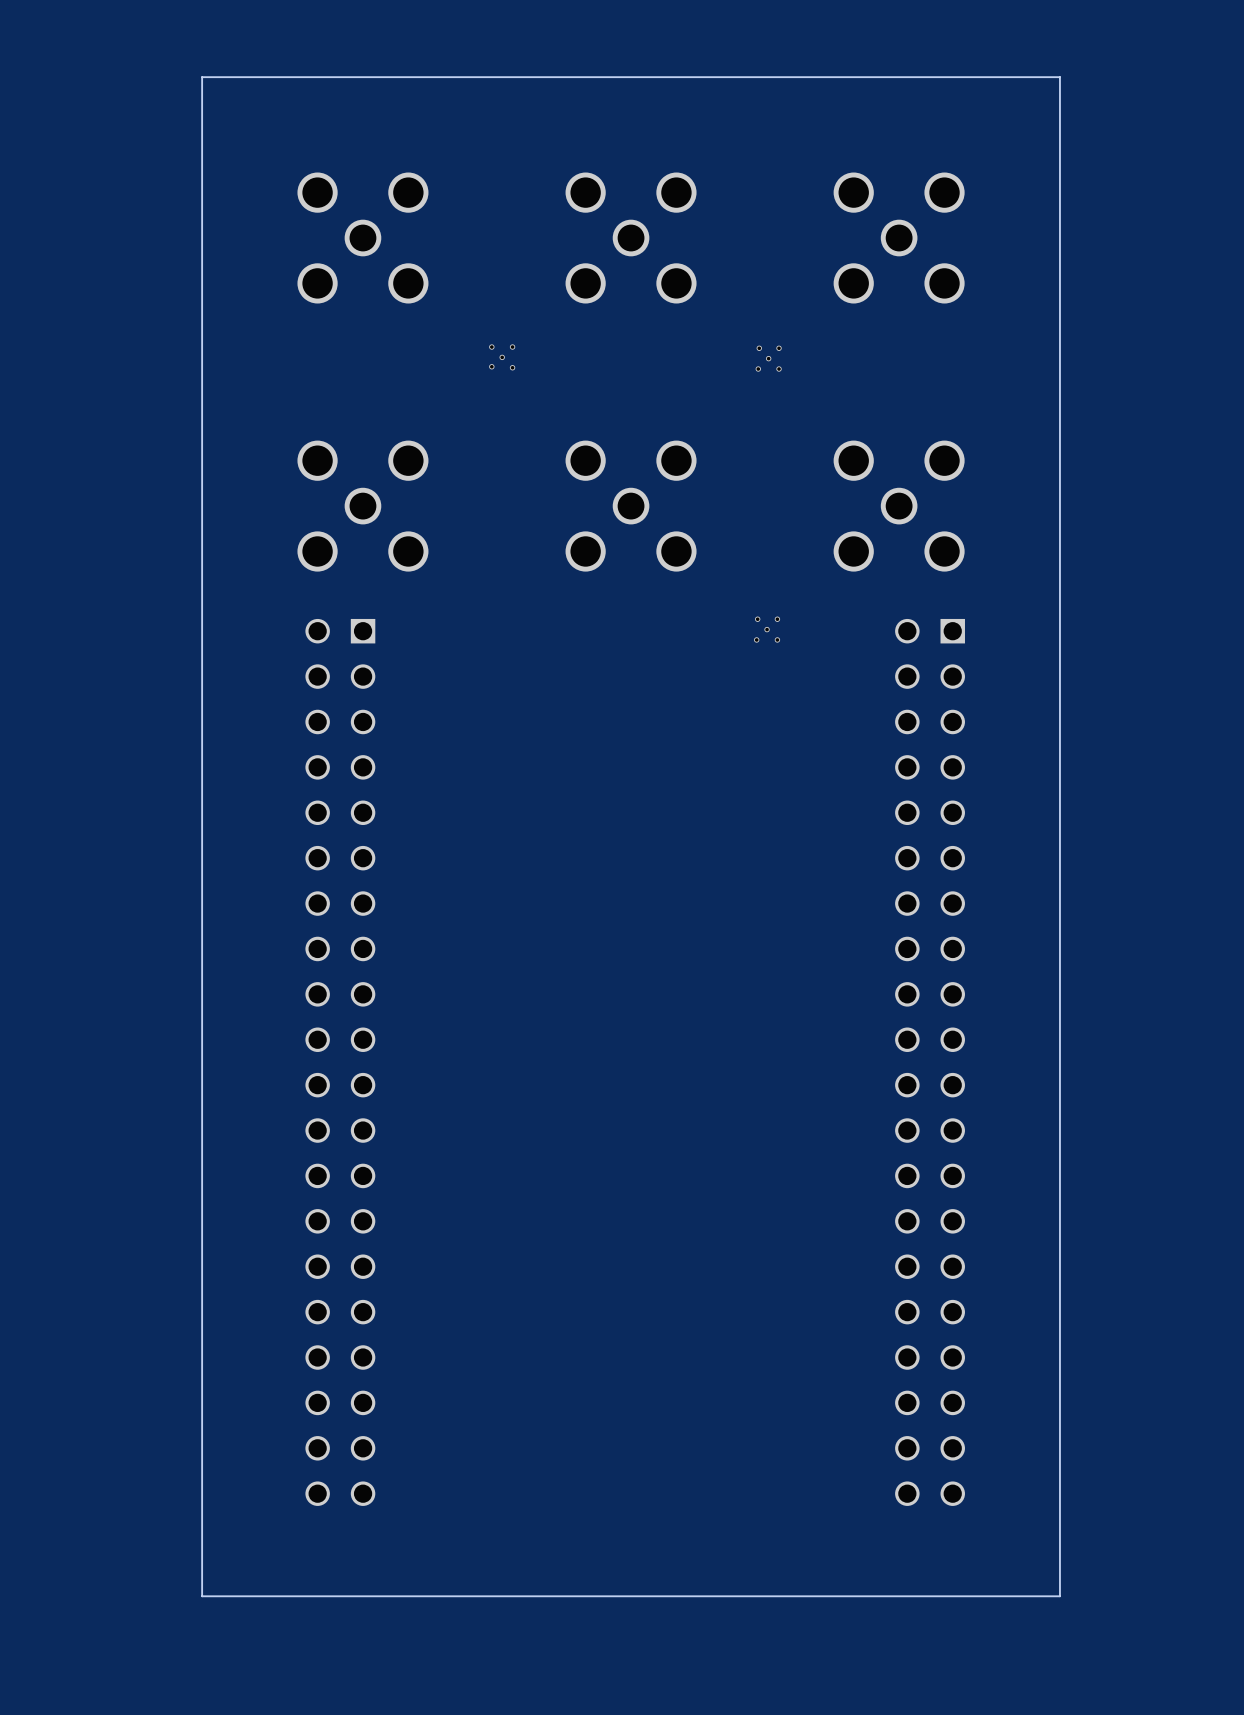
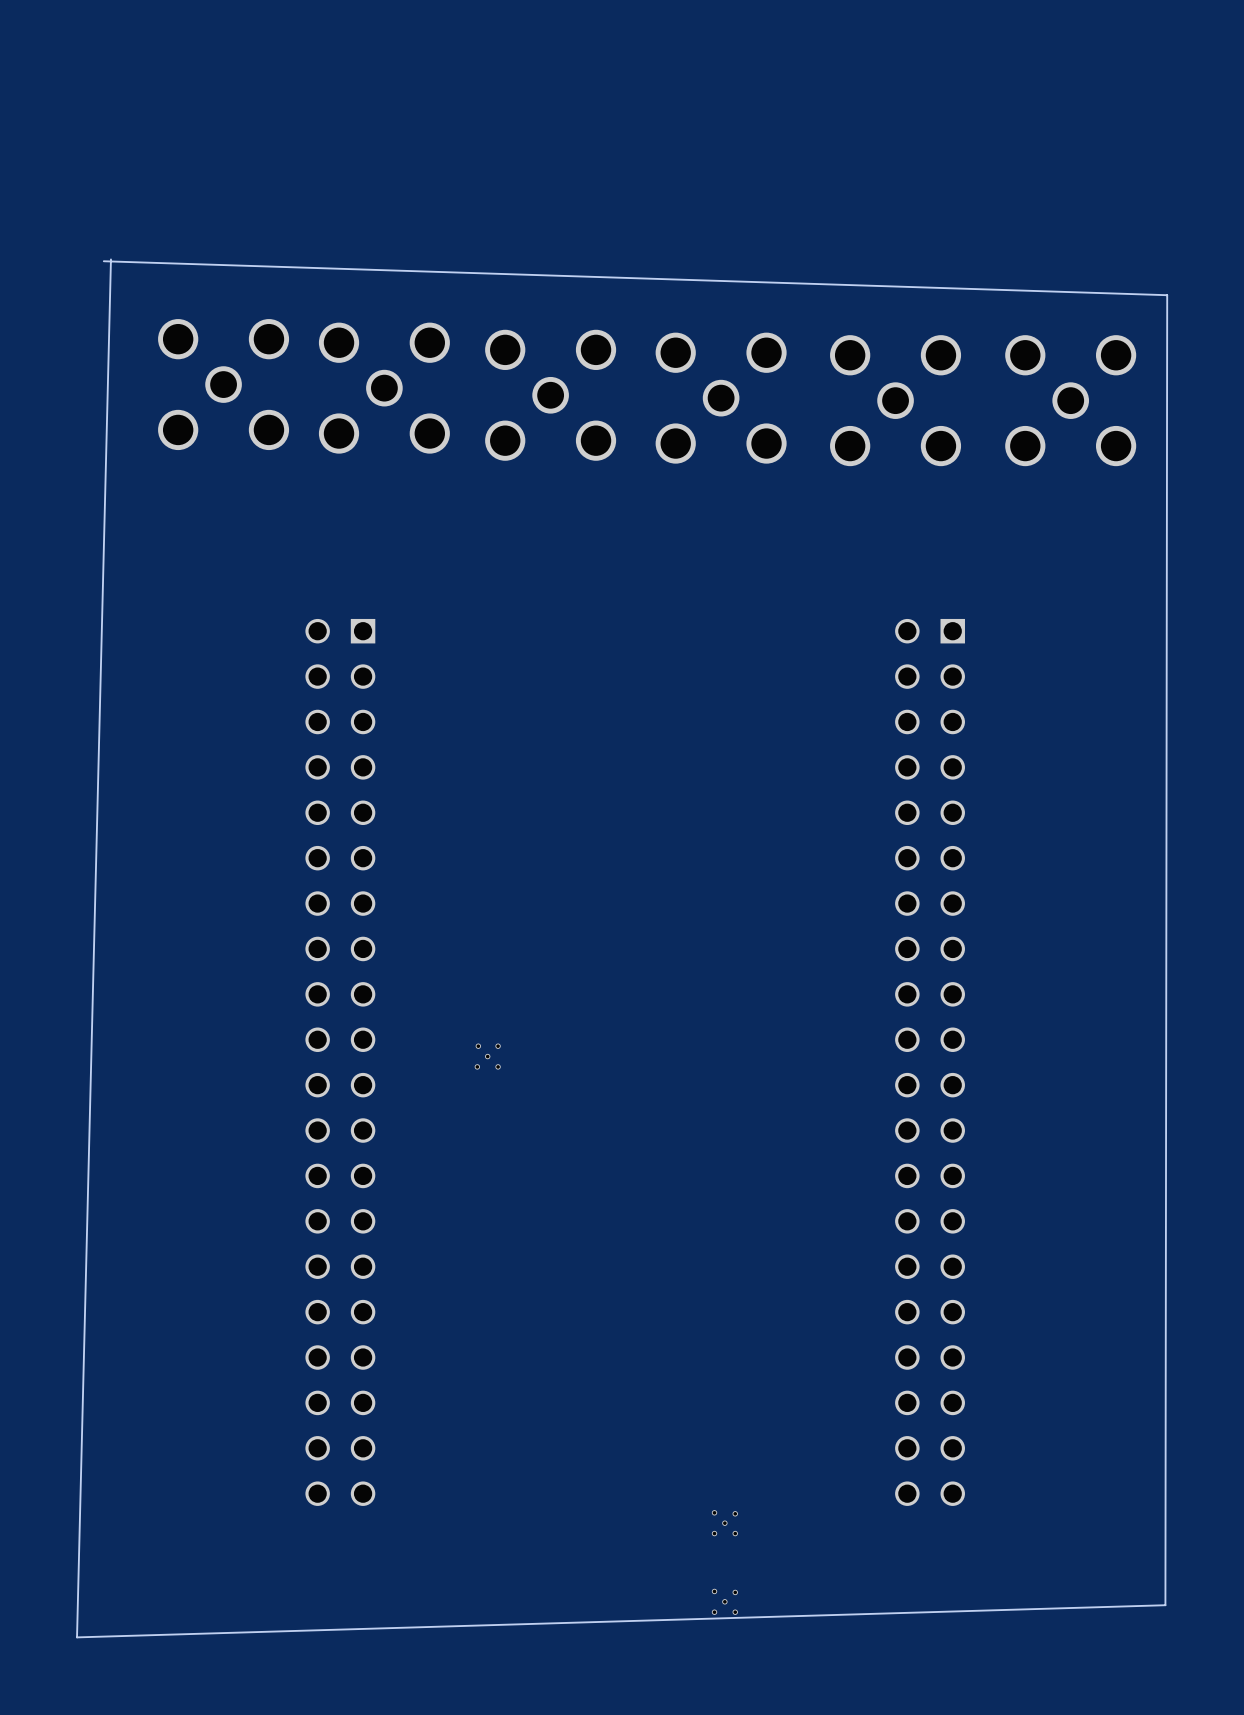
board edge: (1059, 77) (202, 77) (202, 1596) (1059, 1596) (1059, 77) -> none
part: (362, 238) -> none
part: (631, 238) -> none
part: (899, 238) -> none
board edge: none -> (110, 259) (77, 1637) (1165, 1605) (1167, 295) (103, 261)
part: (502, 357) -> none
part: (768, 358) -> none
part: none -> (223, 384)
part: none -> (384, 388)
part: none -> (550, 395)
part: none -> (721, 398)
part: none -> (895, 400)
part: none -> (1070, 400)
part: (362, 506) -> none
part: (631, 506) -> none
part: (899, 506) -> none
part: (767, 629) -> none
part: none -> (487, 1056)
part: none -> (724, 1523)
part: none -> (724, 1601)

